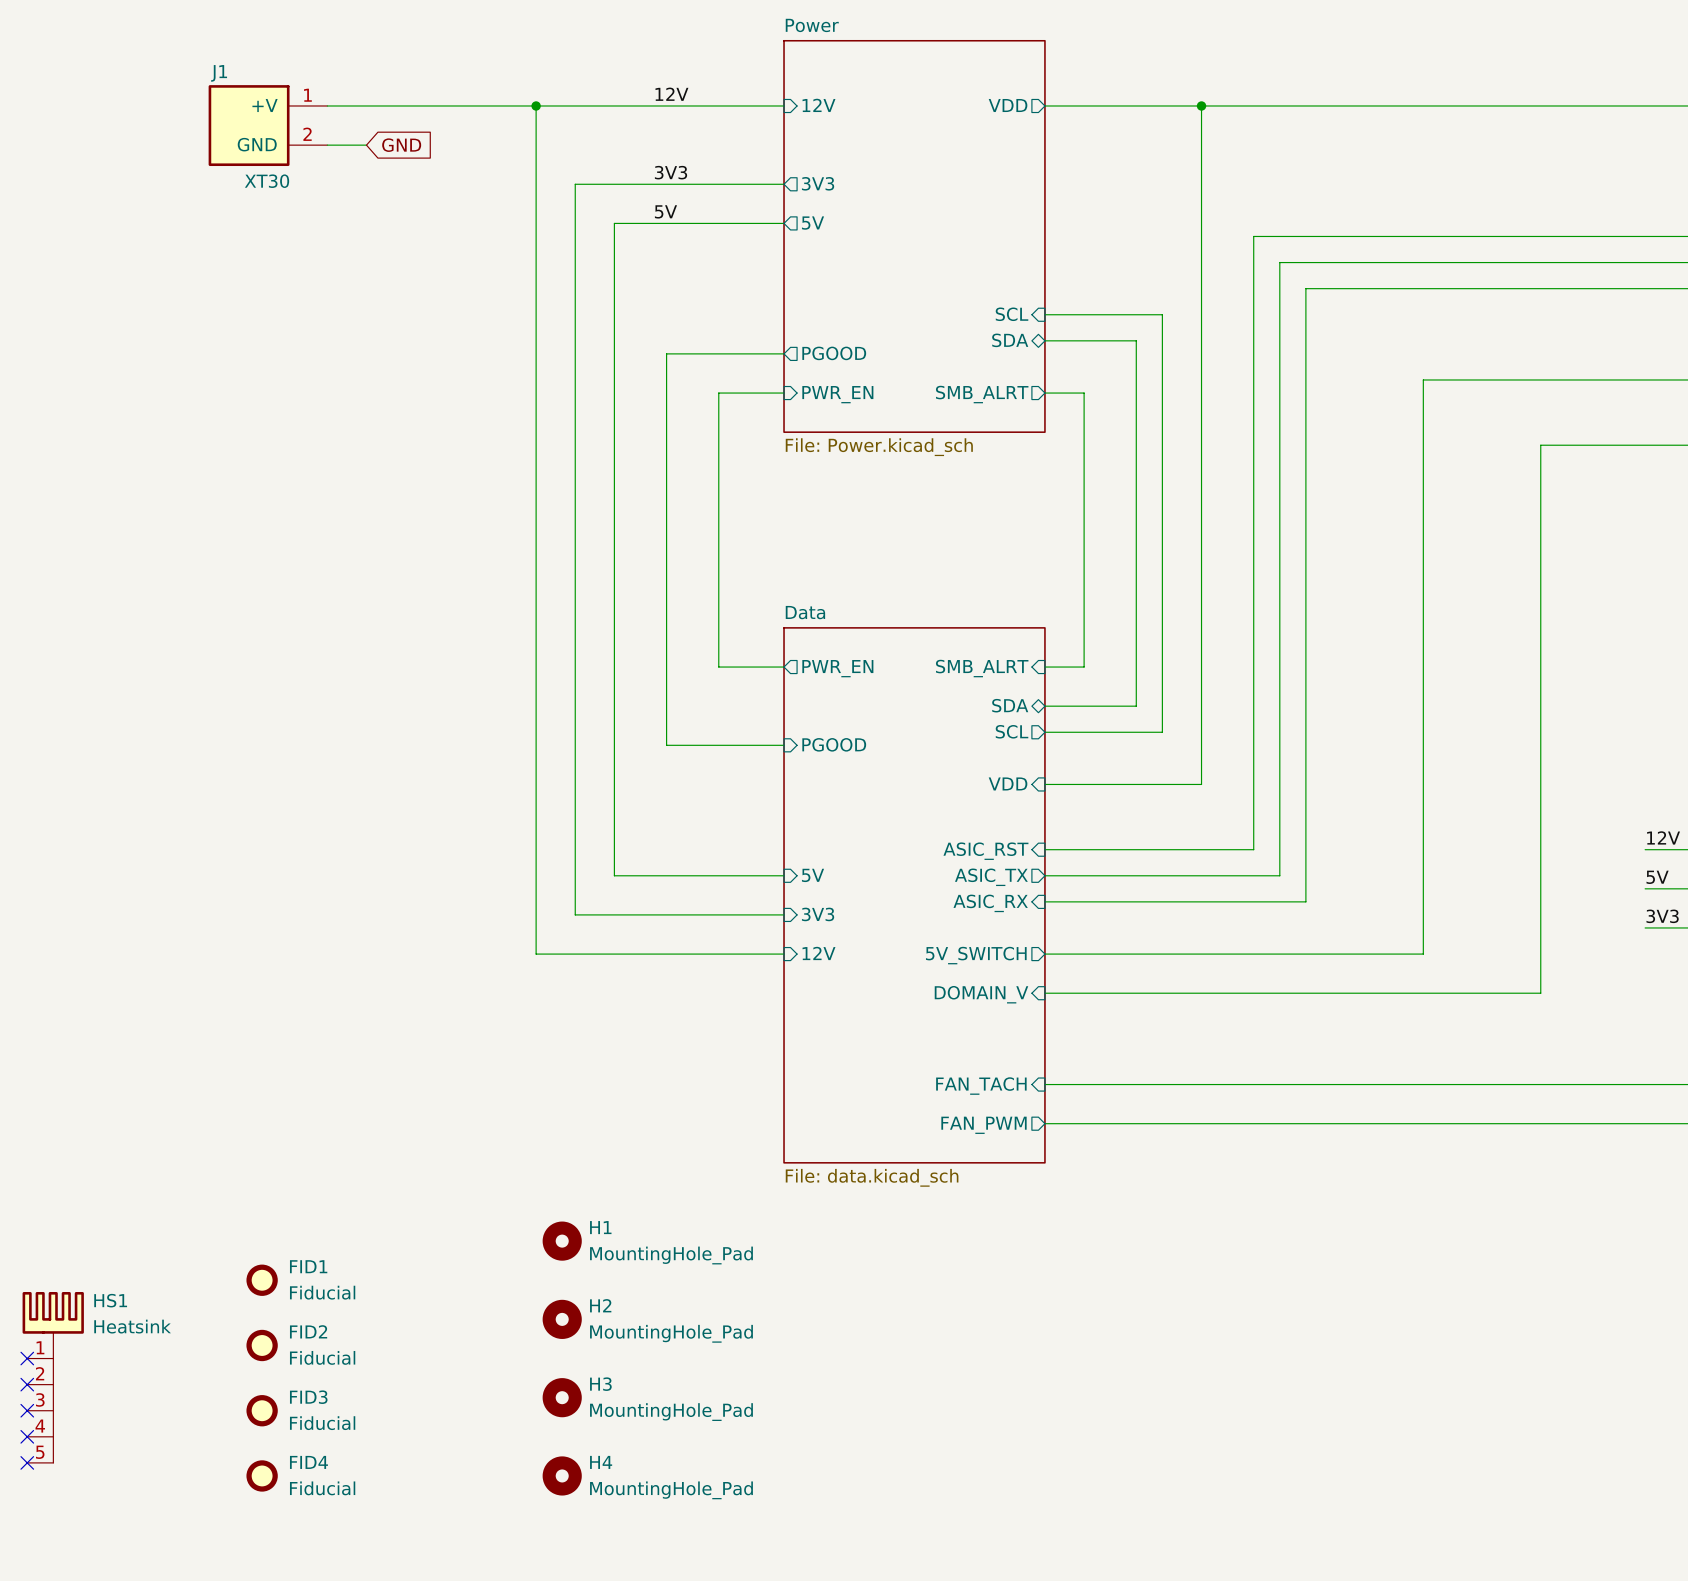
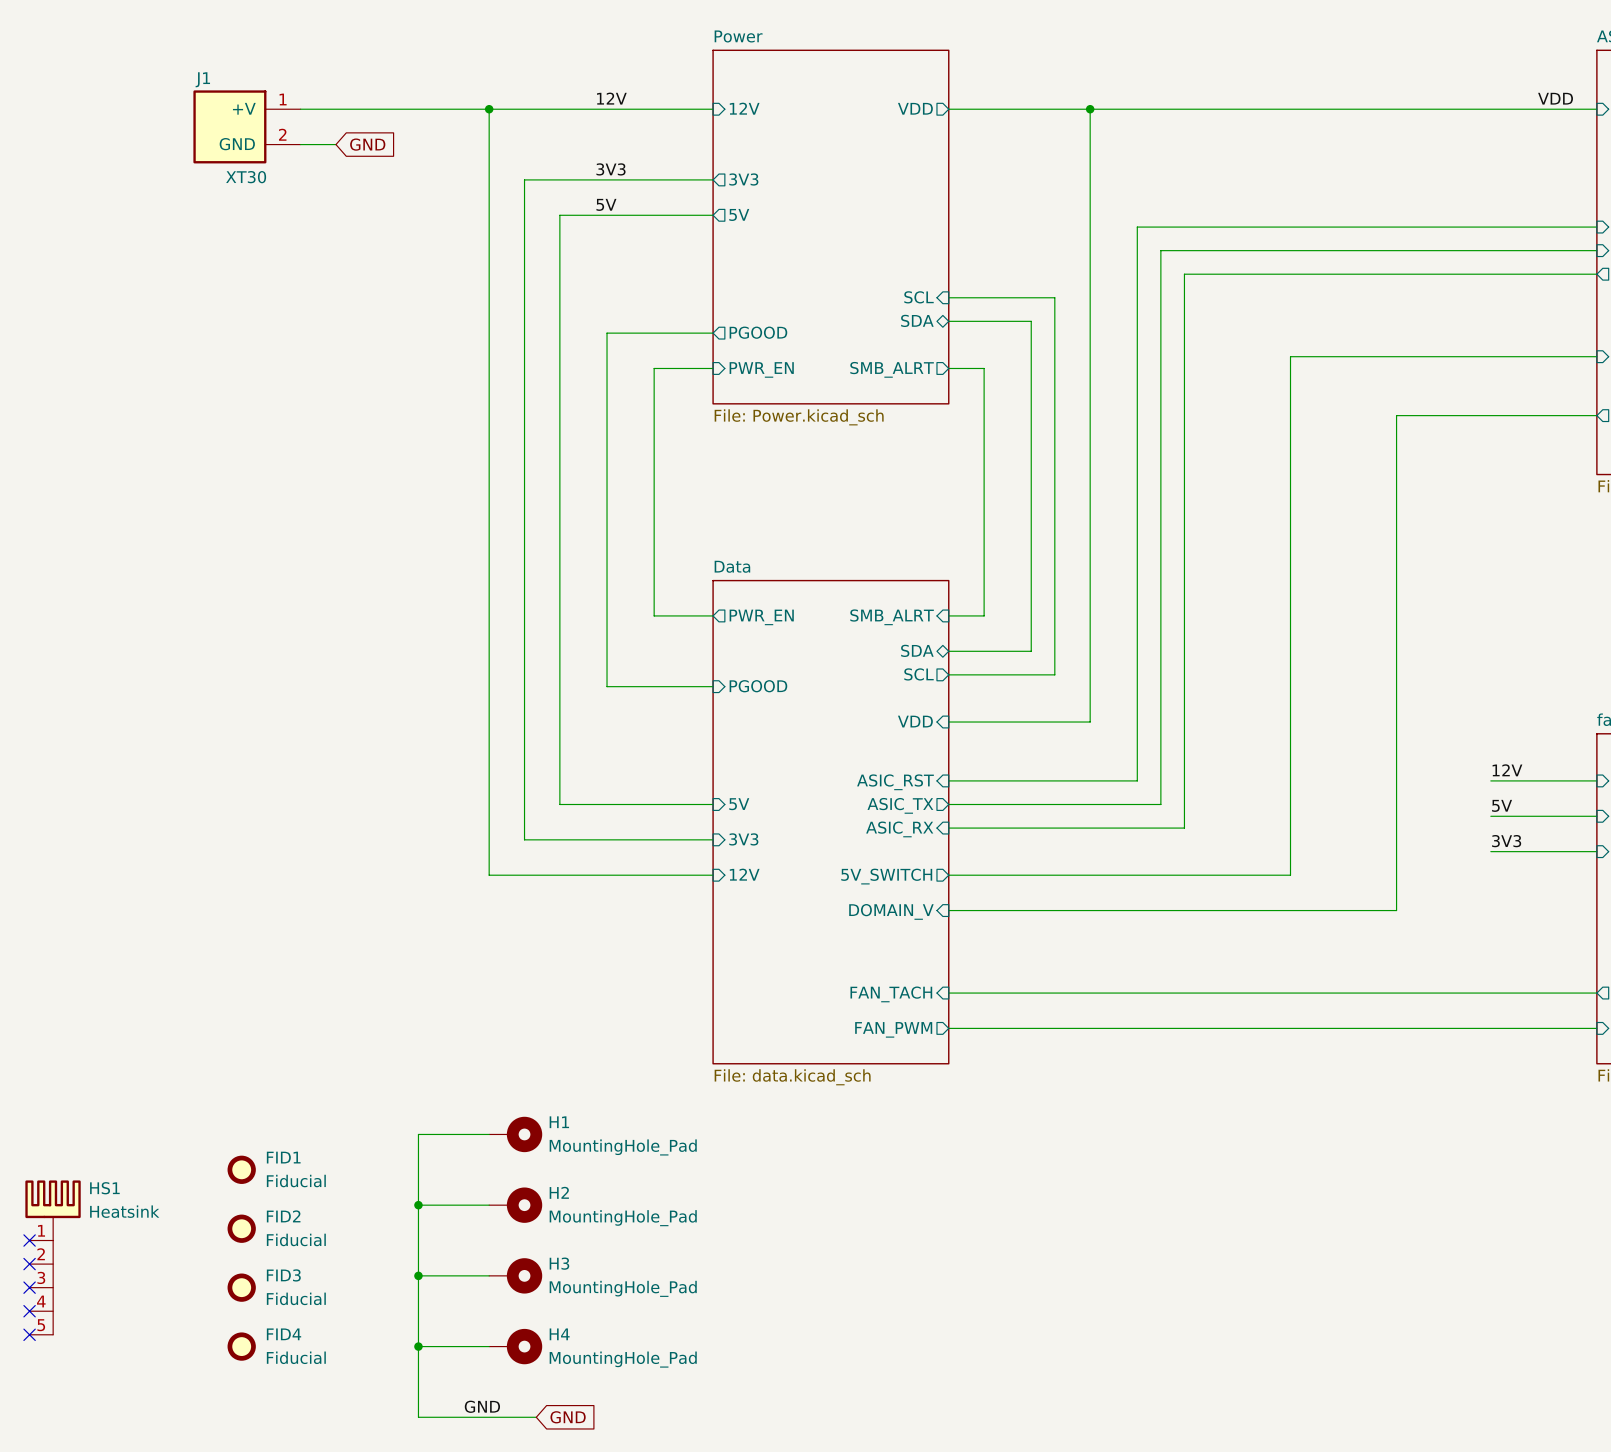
H1 symbol: [542, 1221, 582, 1261] -> [489, 1116, 543, 1153]
wire: none -> (489, 1134) (418, 1134) (418, 1417) (536, 1417)
H2 symbol: [542, 1299, 582, 1339] -> [489, 1187, 543, 1223]
wire: none -> (418, 1205) (489, 1205)
junction: none -> (418, 1205)
H3 symbol: [542, 1378, 582, 1418] -> [489, 1258, 543, 1294]
wire: none -> (418, 1275) (489, 1275)
junction: none -> (418, 1275)
H4 symbol: [542, 1456, 582, 1496] -> [489, 1328, 543, 1365]
wire: none -> (418, 1346) (489, 1346)
junction: none -> (418, 1346)
label: none -> GND (482, 1406)
global label: none -> GND (568, 1417)

